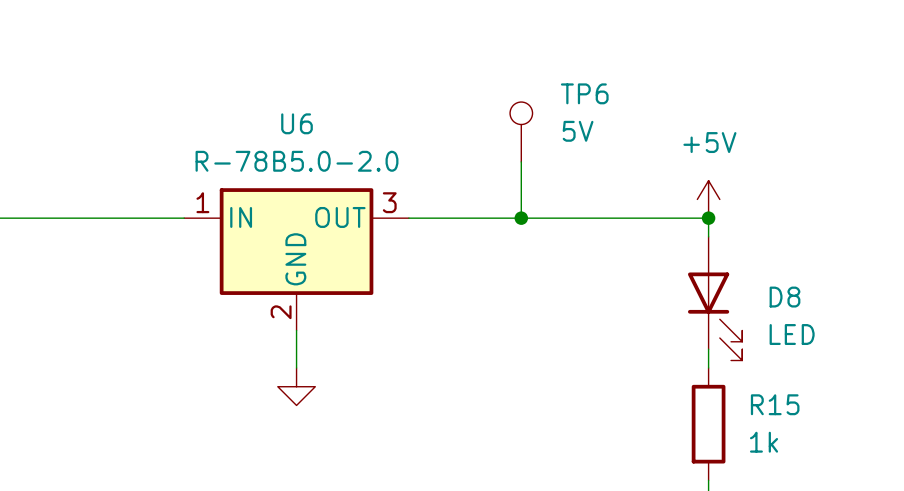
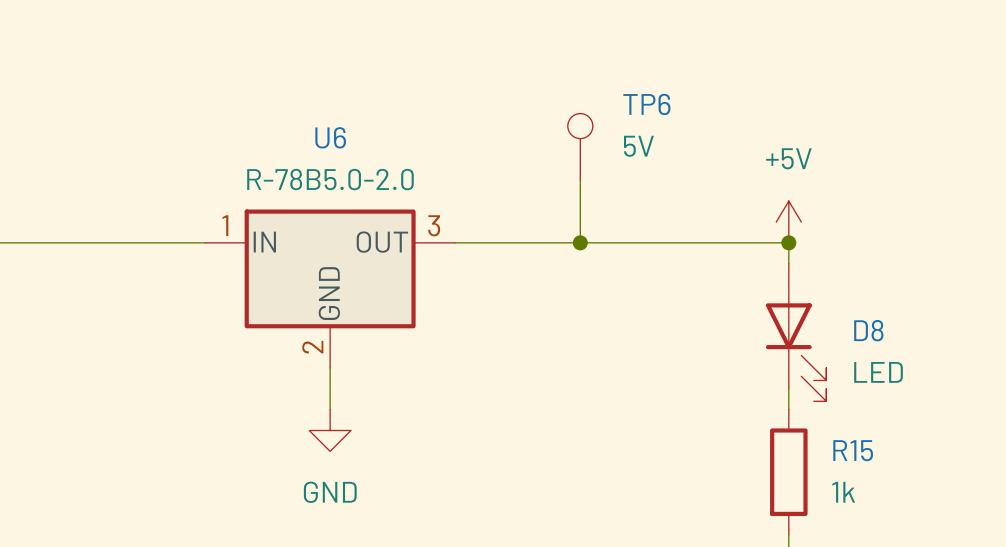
power symbol text: none -> GND (330, 492)

